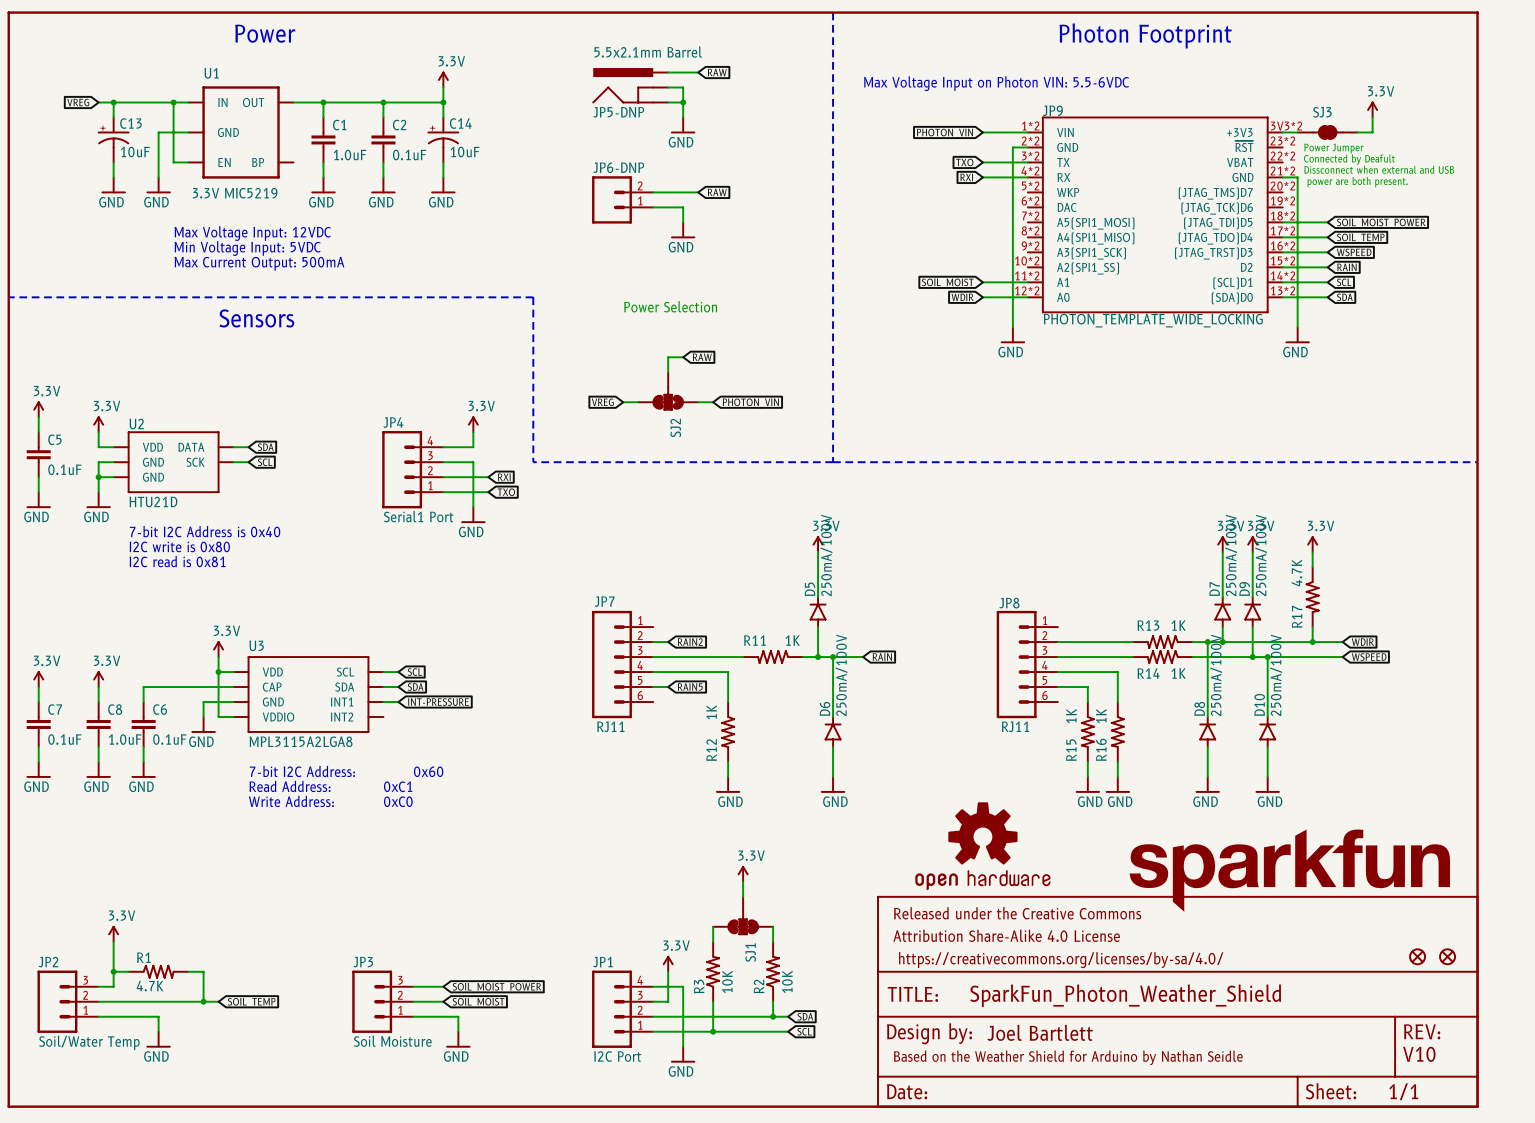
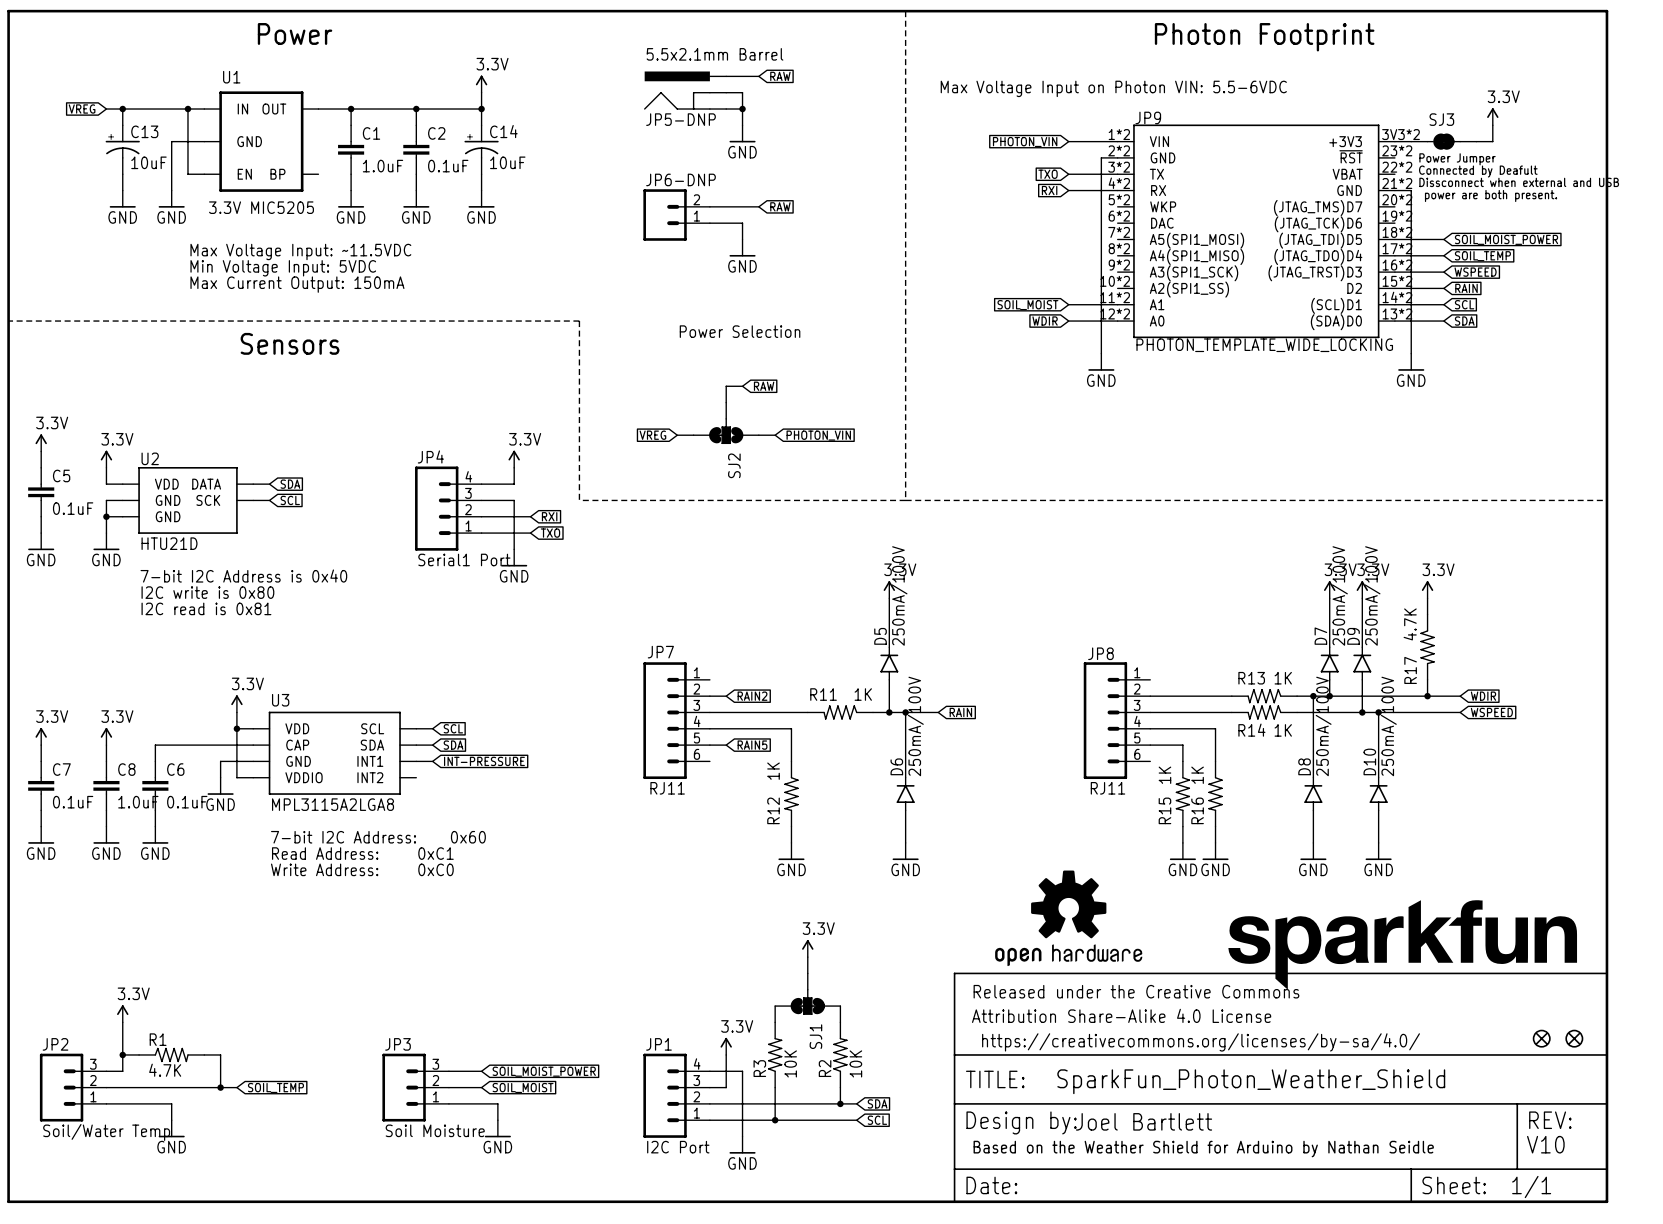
U1 value: 3.3V MIC5219 (235, 193) -> 3.3V MIC5205 (261, 207)
text: Max Voltage Input: 12VDC (252, 233) -> Max Voltage Input: ~11.5VDC (300, 251)
text: Max Current Output: 500mA (259, 263) -> Max Current Output: 150mA (297, 284)

